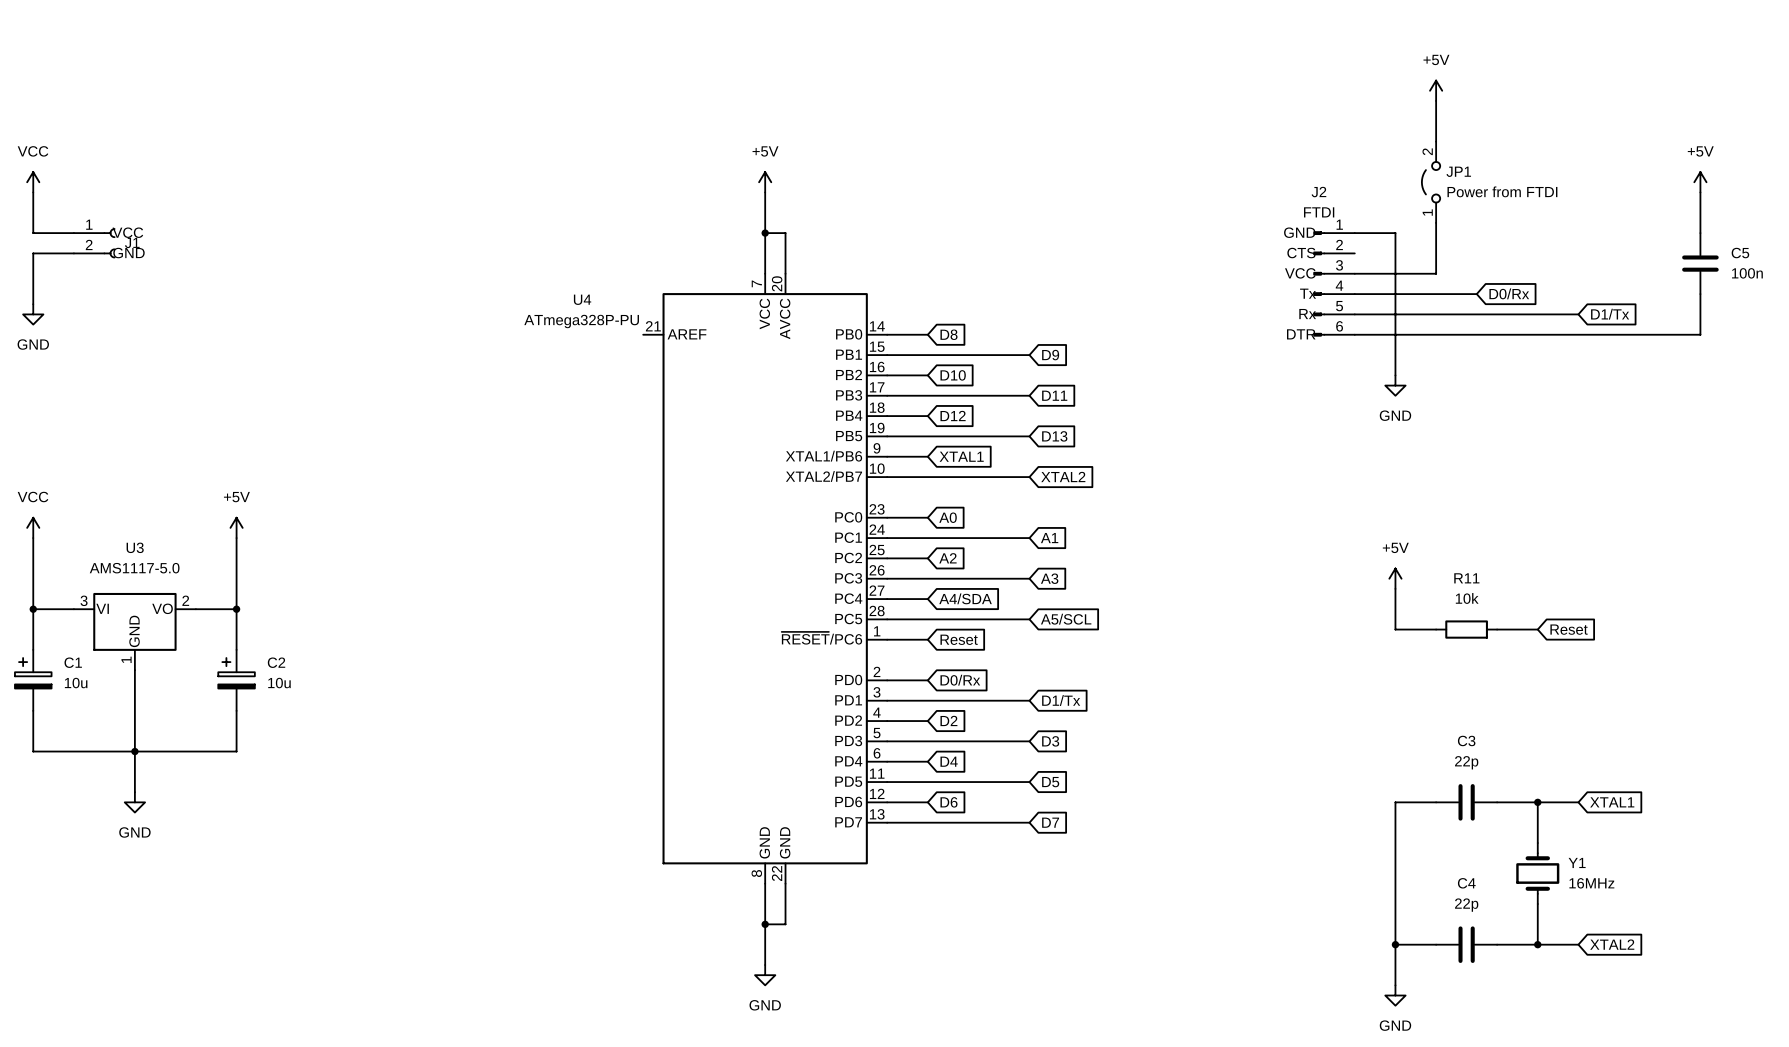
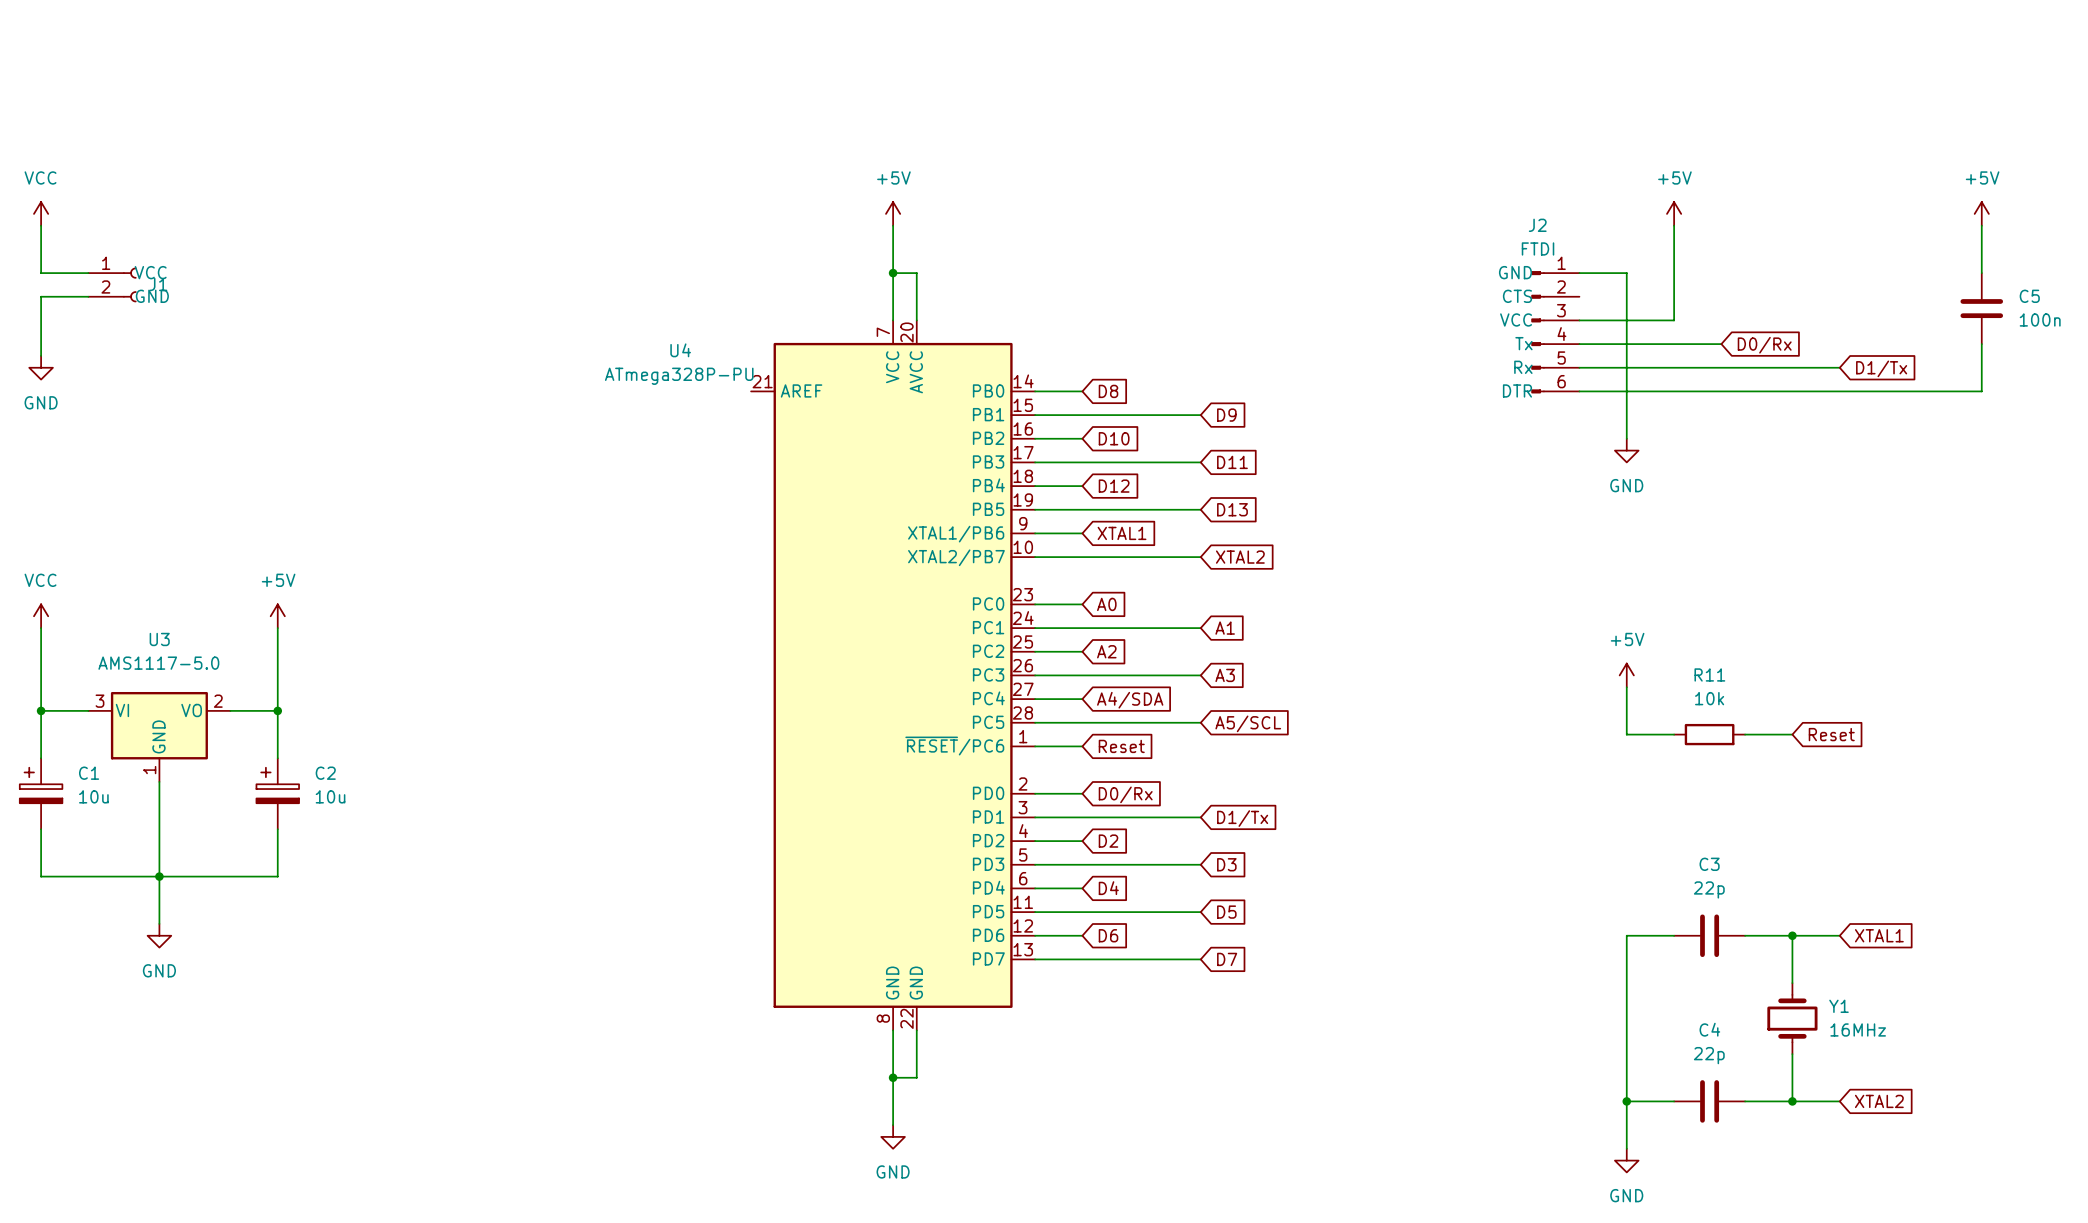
power symbol position: +5V (1436, 90) -> +5V (1674, 213)
wire: (1436, 100) (1436, 141) -> none
JP1: Power from FTDI (1431, 182) -> none

